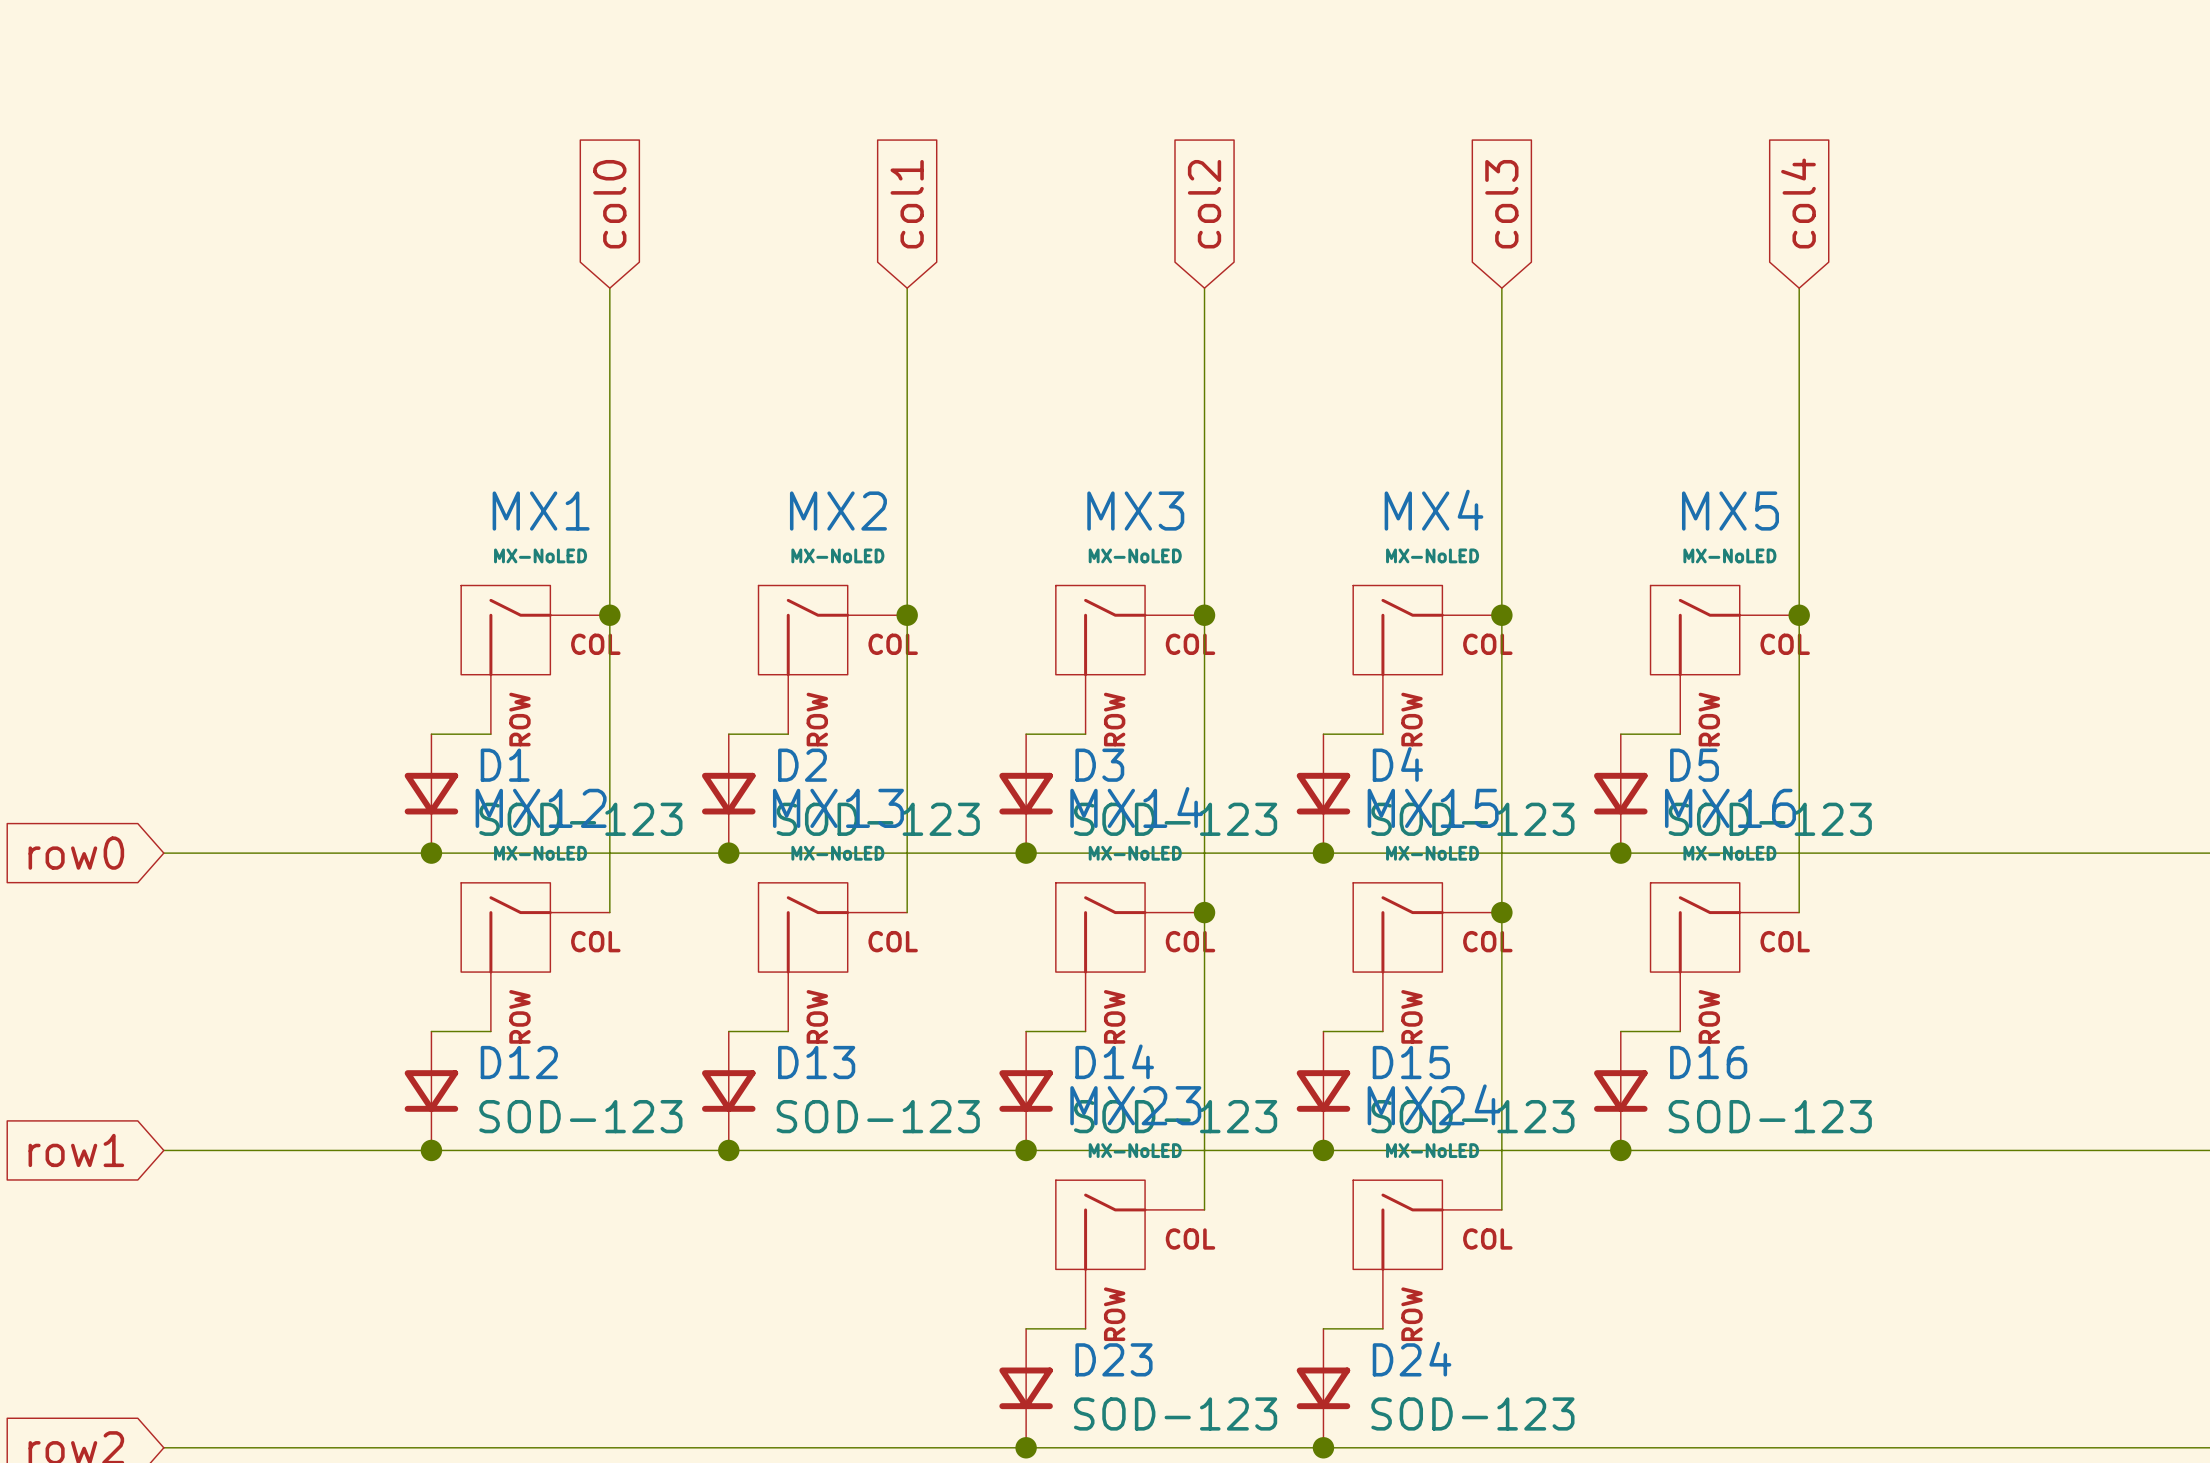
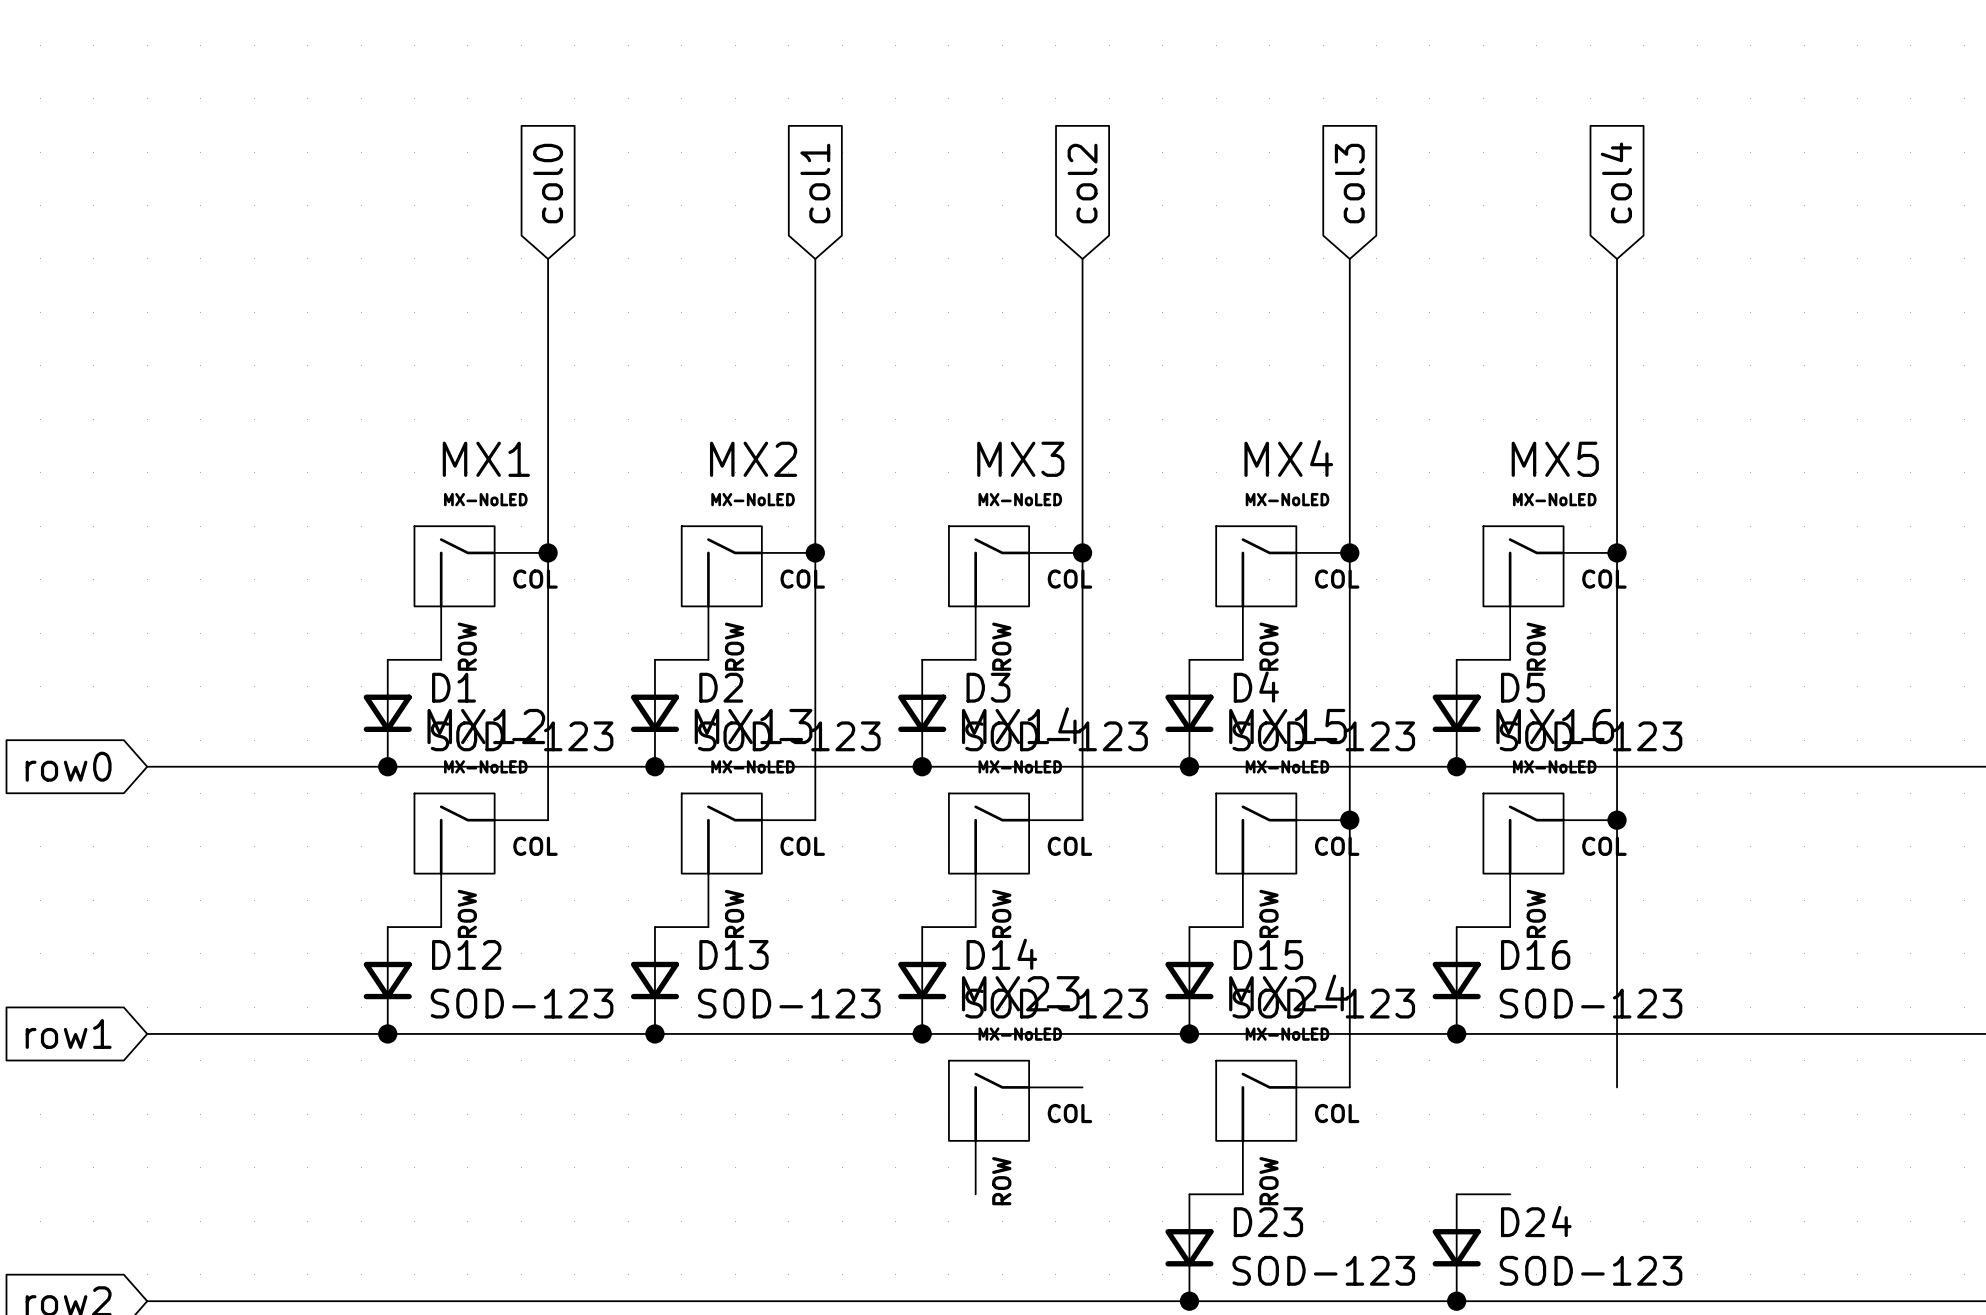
wire: (1204, 912) (1204, 1209) -> none
junction: (1204, 912) -> none
wire: none -> (1617, 820) (1617, 1087)
junction: none -> (1617, 820)
wire: (1026, 1328) (1085, 1328) -> none
wire: none -> (1456, 1194) (1510, 1194)
D24 name: D24 (1412, 1359) -> D23 (1268, 1222)
D23: SOD-123 (1026, 1388) -> none
D24: none -> SOD-123 (1456, 1247)
junction: (1026, 1447) -> none
junction: none -> (1456, 1301)

